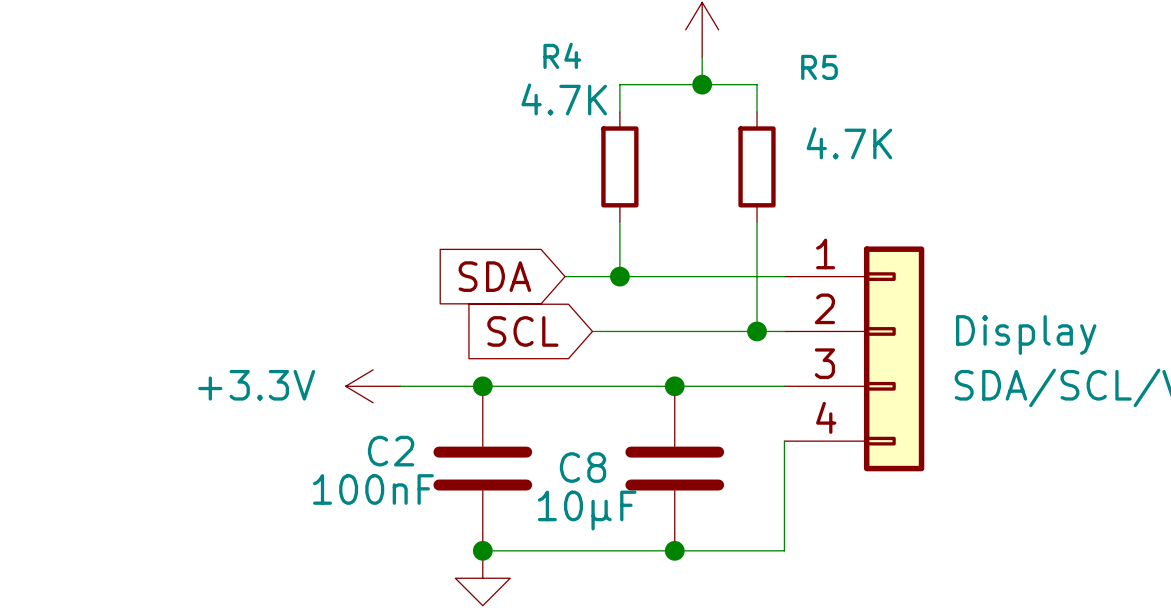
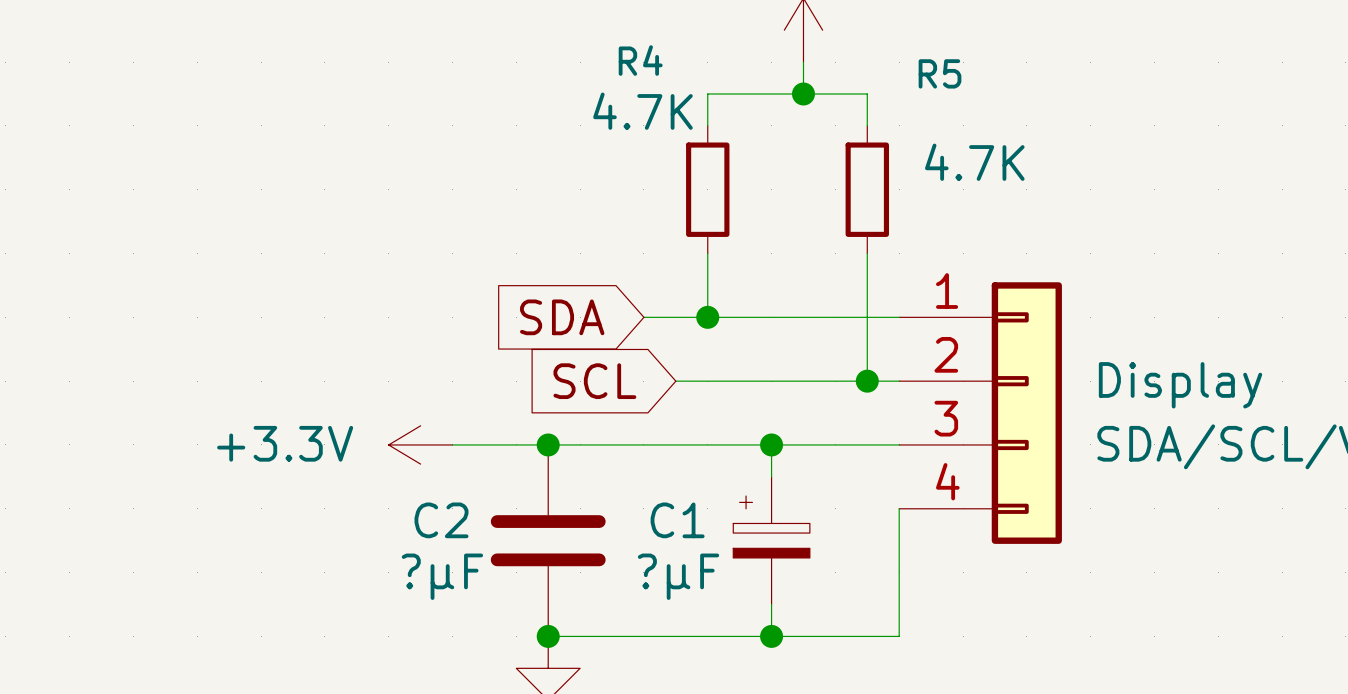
C8: 10µF (674, 468) -> none
C1: none -> ?µF (771, 540)
C2 value: 100nF (373, 489) -> ?µF (442, 576)

